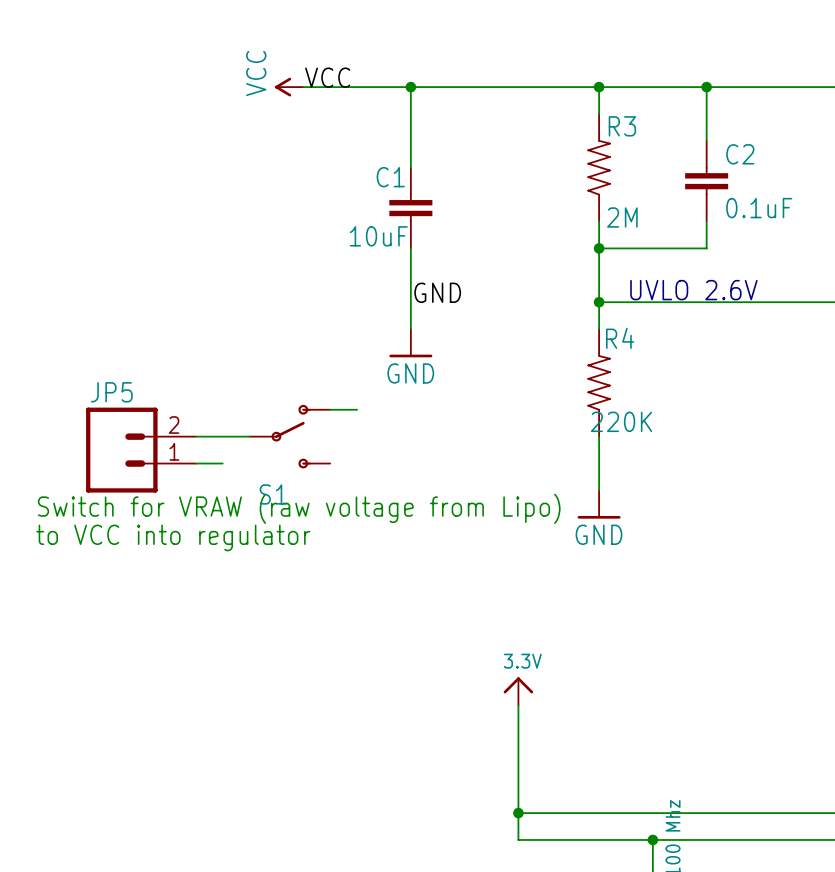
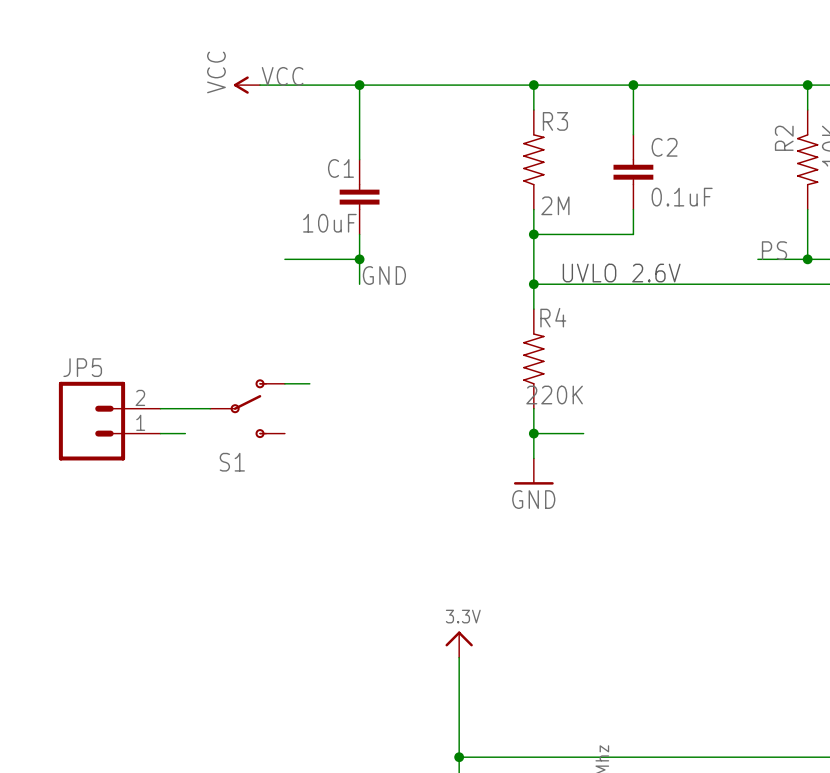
wire: none -> (284, 259) (359, 259)
junction: none -> (359, 259)
wire: (410, 302) (410, 329) -> none
power symbol: GND (410, 343) -> none
wire: none -> (533, 433) (583, 433)
junction: none -> (533, 433)
text: Switch for VRAW (raw voltage from Lipo) (299, 508) -> none
text: to VCC into regulator (173, 537) -> none

